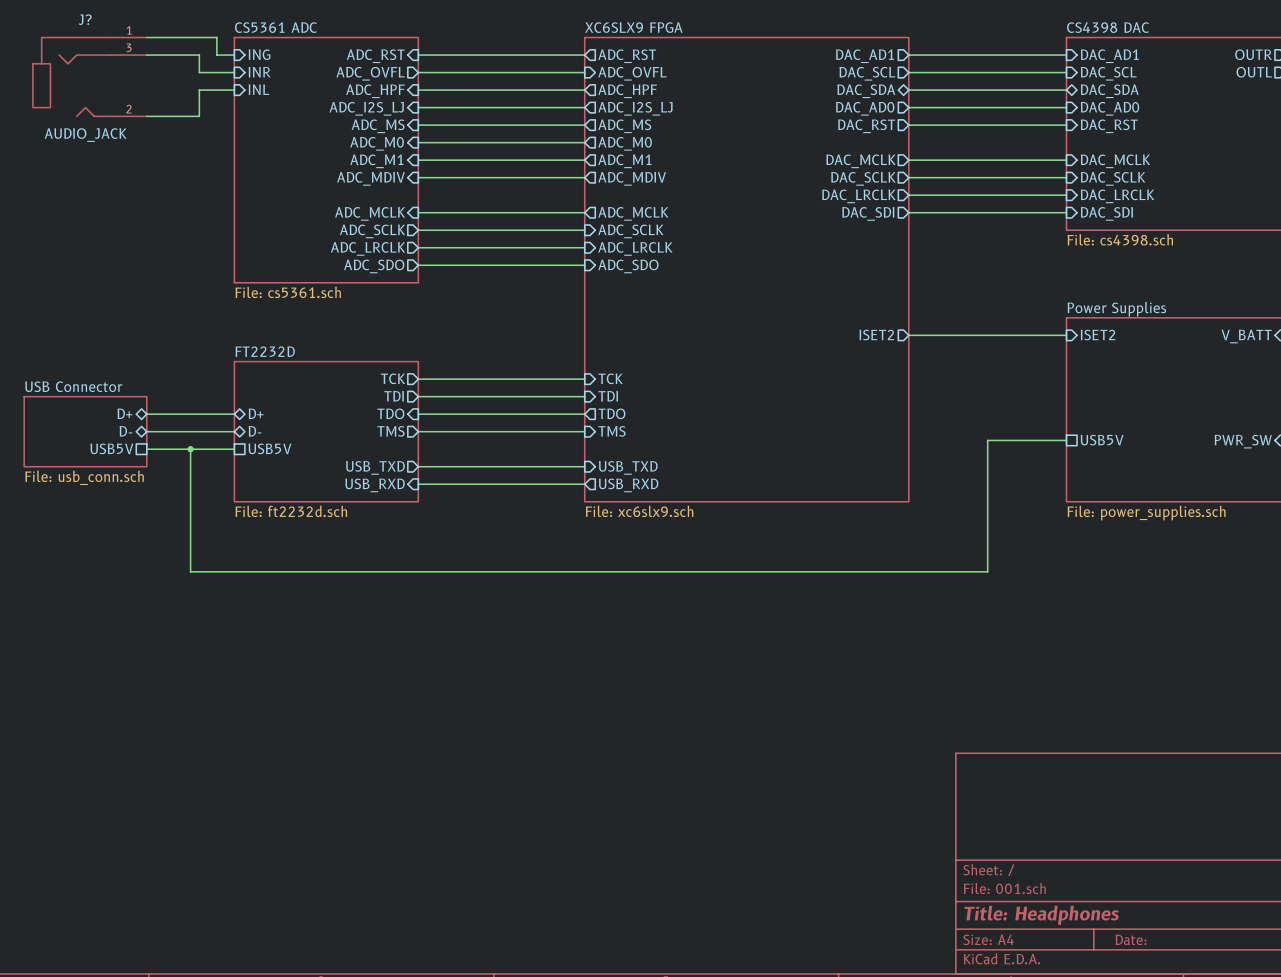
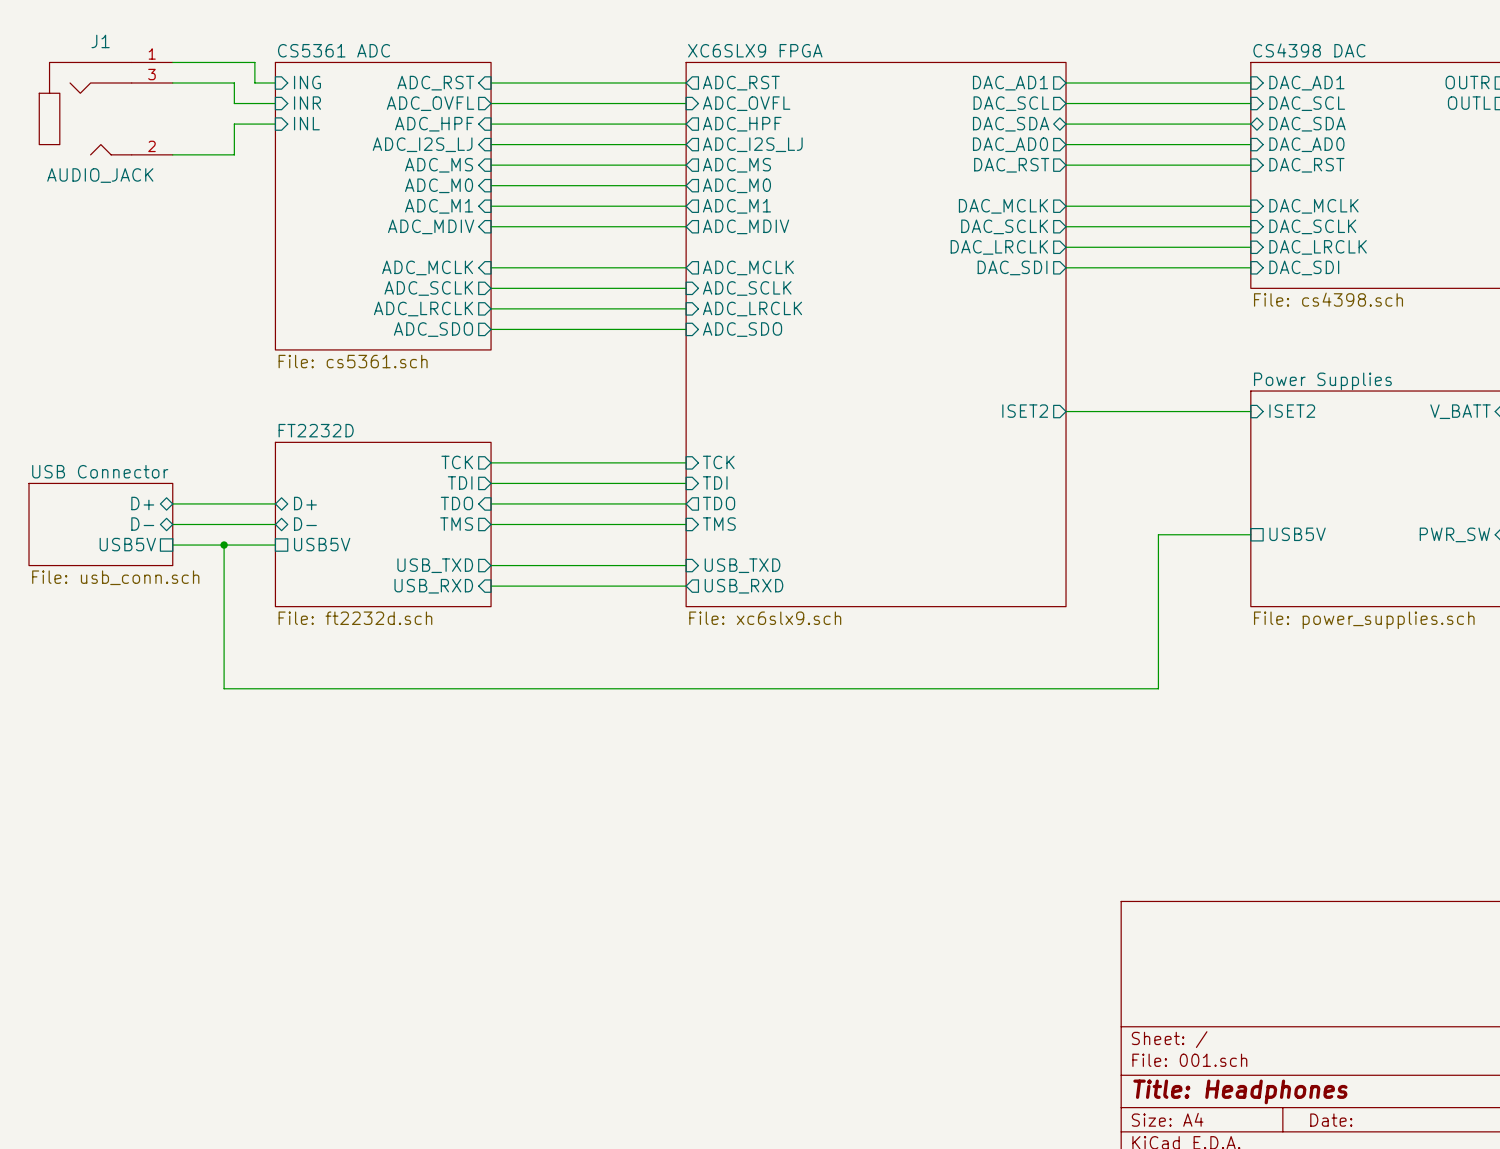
J? name: J? (85, 19) -> J1 (100, 41)

